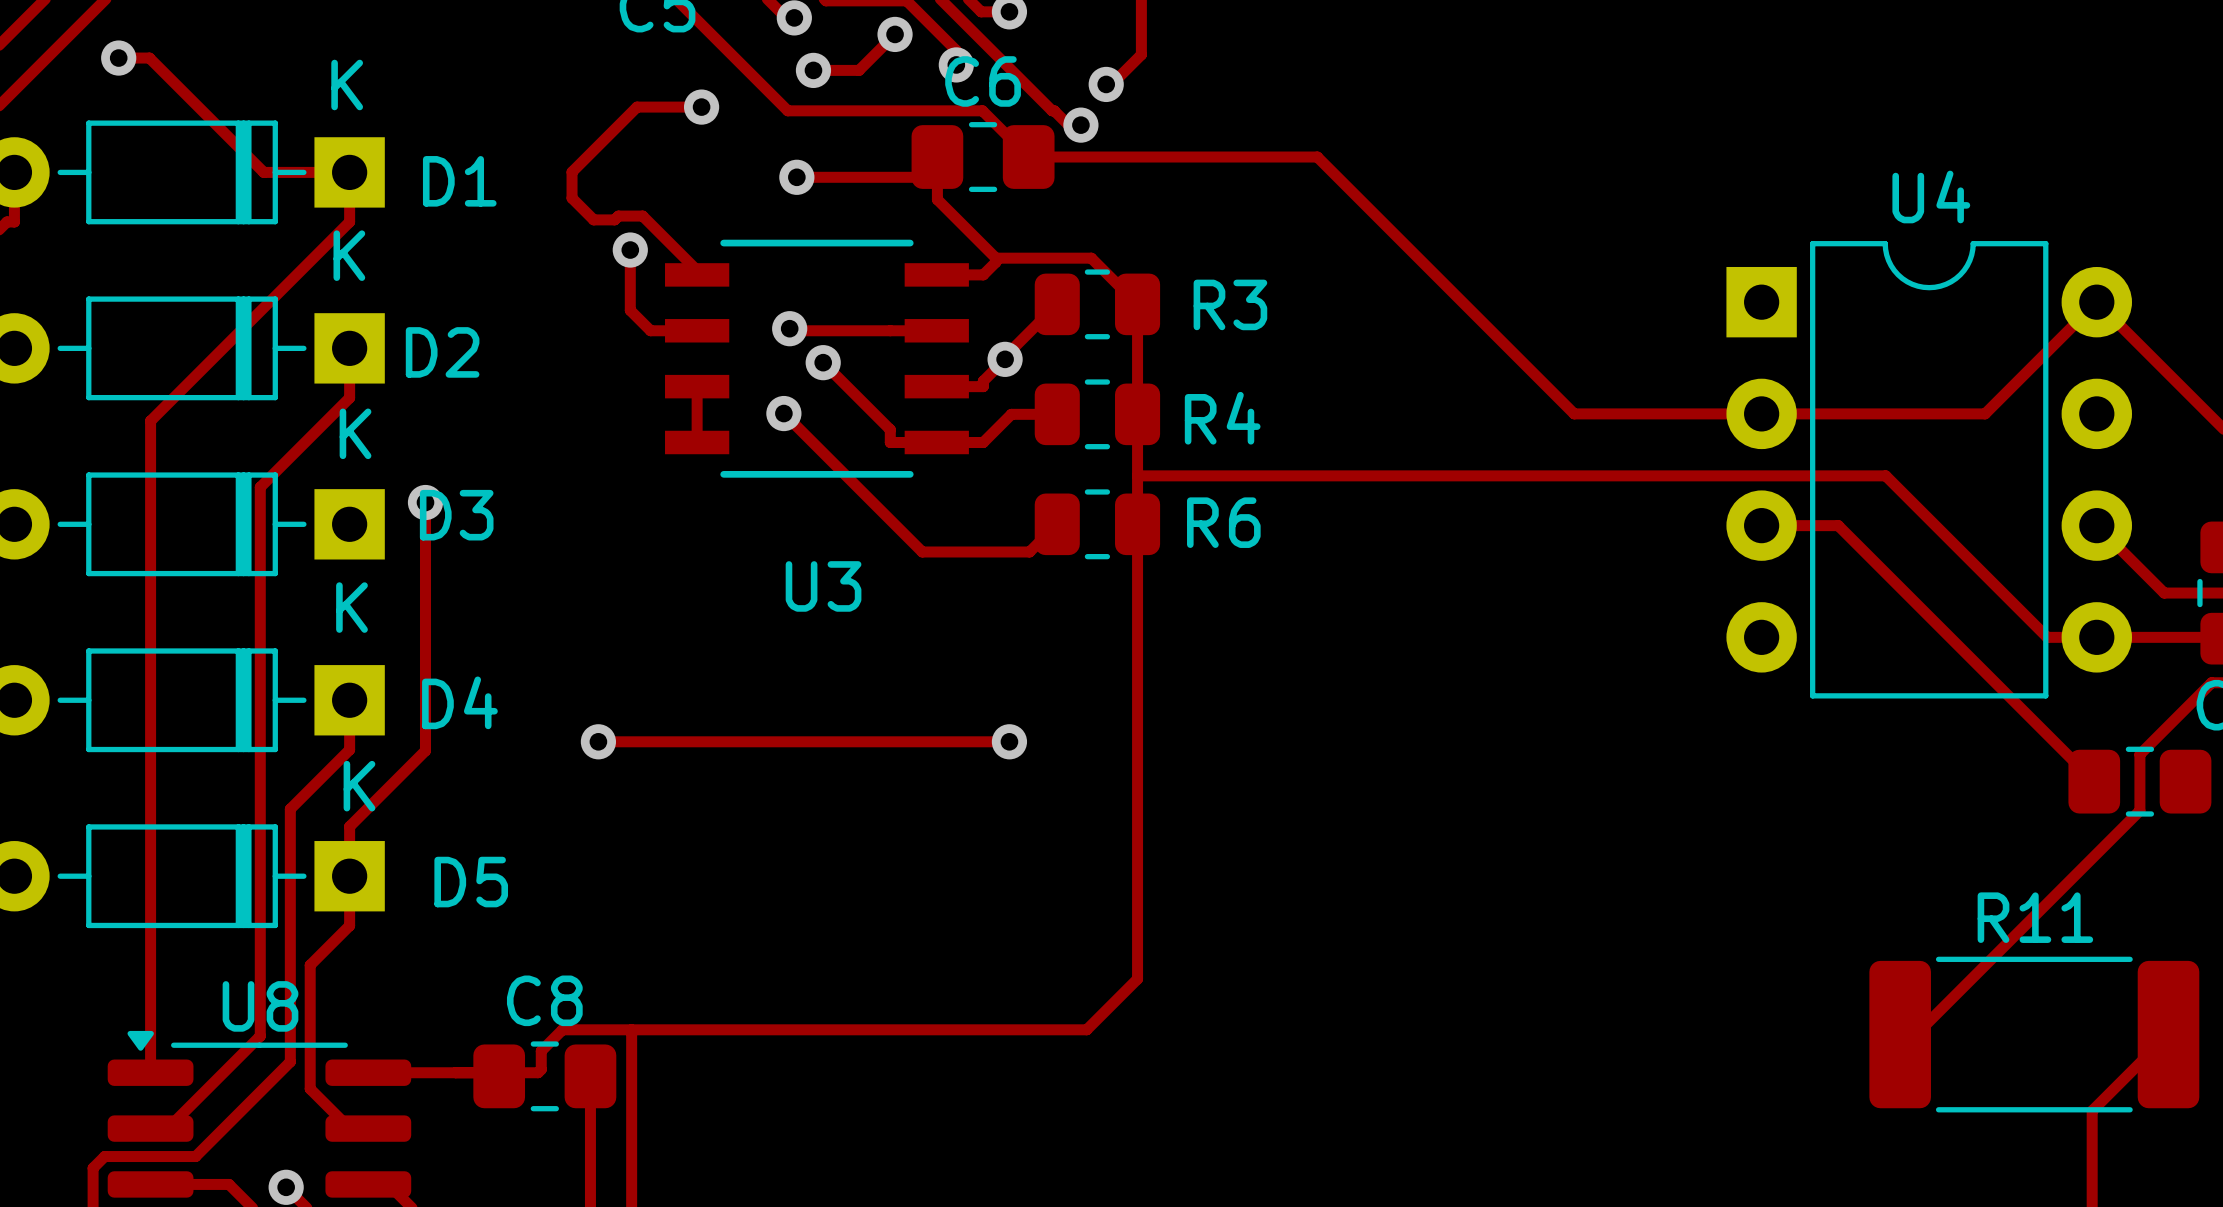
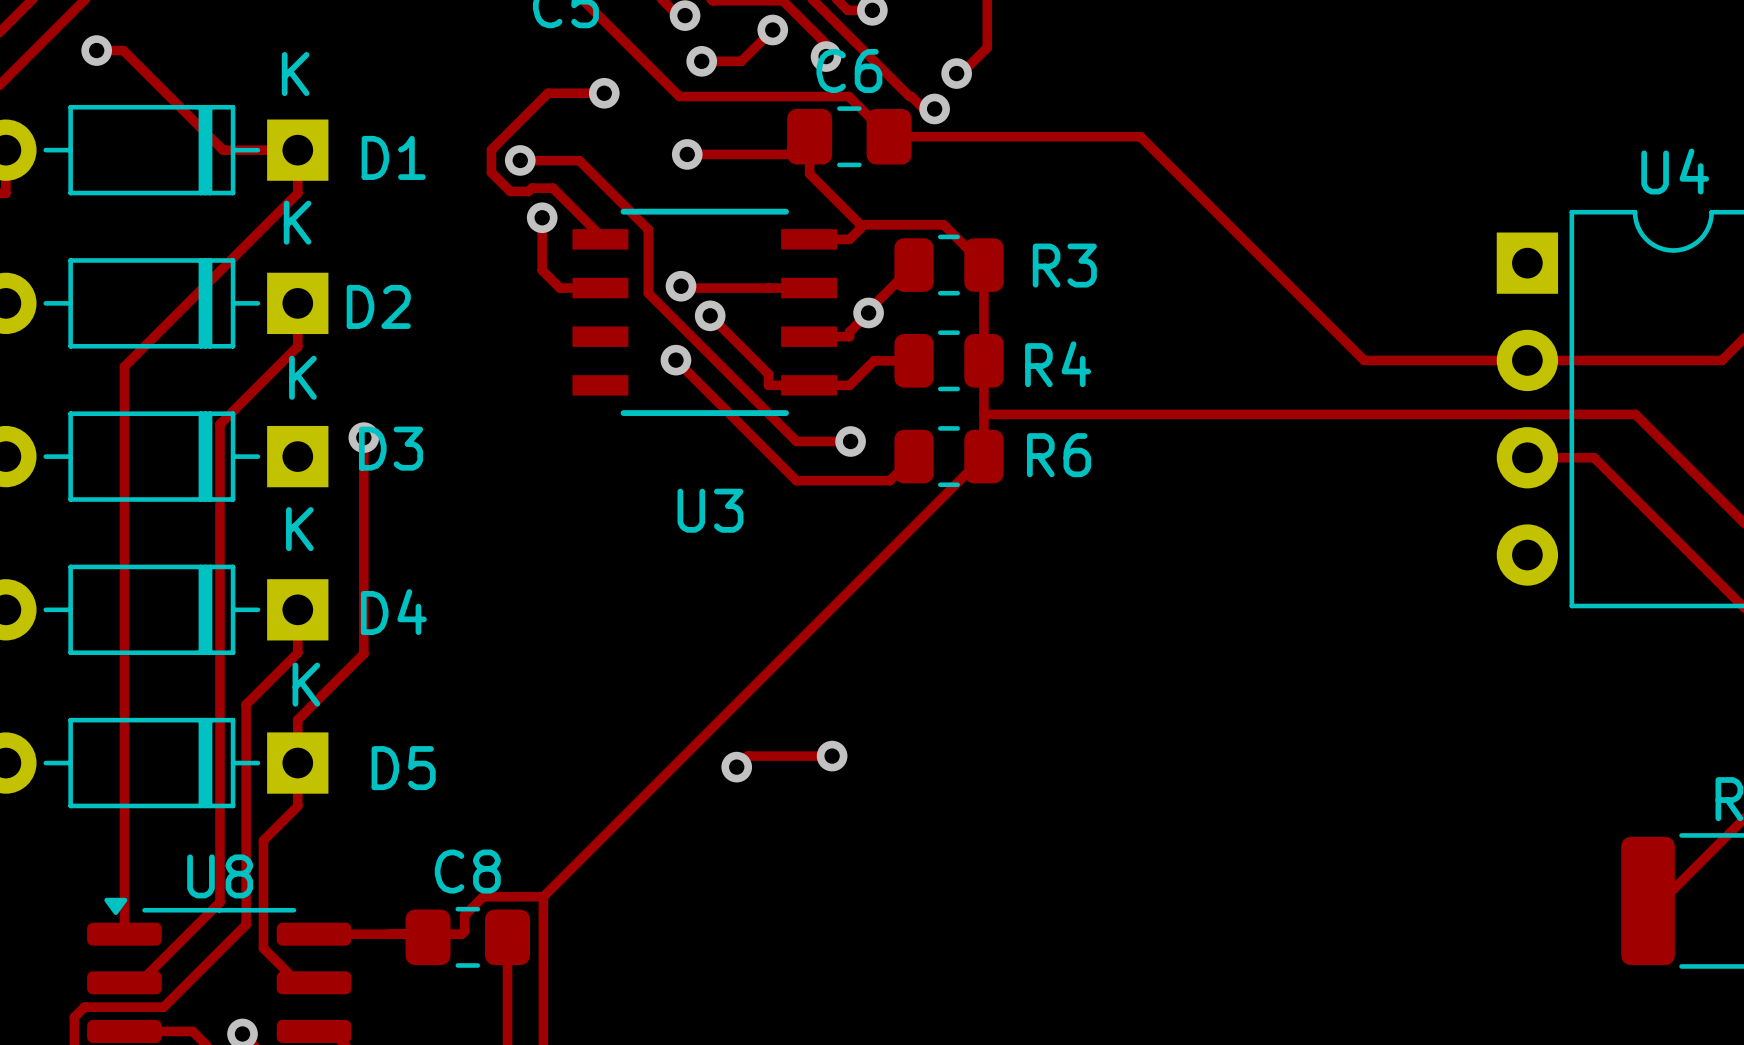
track: none -> (520, 160) (579, 160) (648, 229) (648, 293) (796, 441) (850, 441)
via: none -> (520, 160)
track: (697, 386) (697, 442) -> none
via: none -> (850, 441)
track: (1137, 524) (1137, 979) (1086, 1029) (631, 1029) -> (983, 456) (543, 896)
track: (1016, 739) (1014, 741) (598, 741) -> none
via: (598, 741) -> none
via: (1009, 741) -> none
track: none -> (832, 756) (747, 756) (736, 767)
via: none -> (832, 756)
via: none -> (736, 767)

